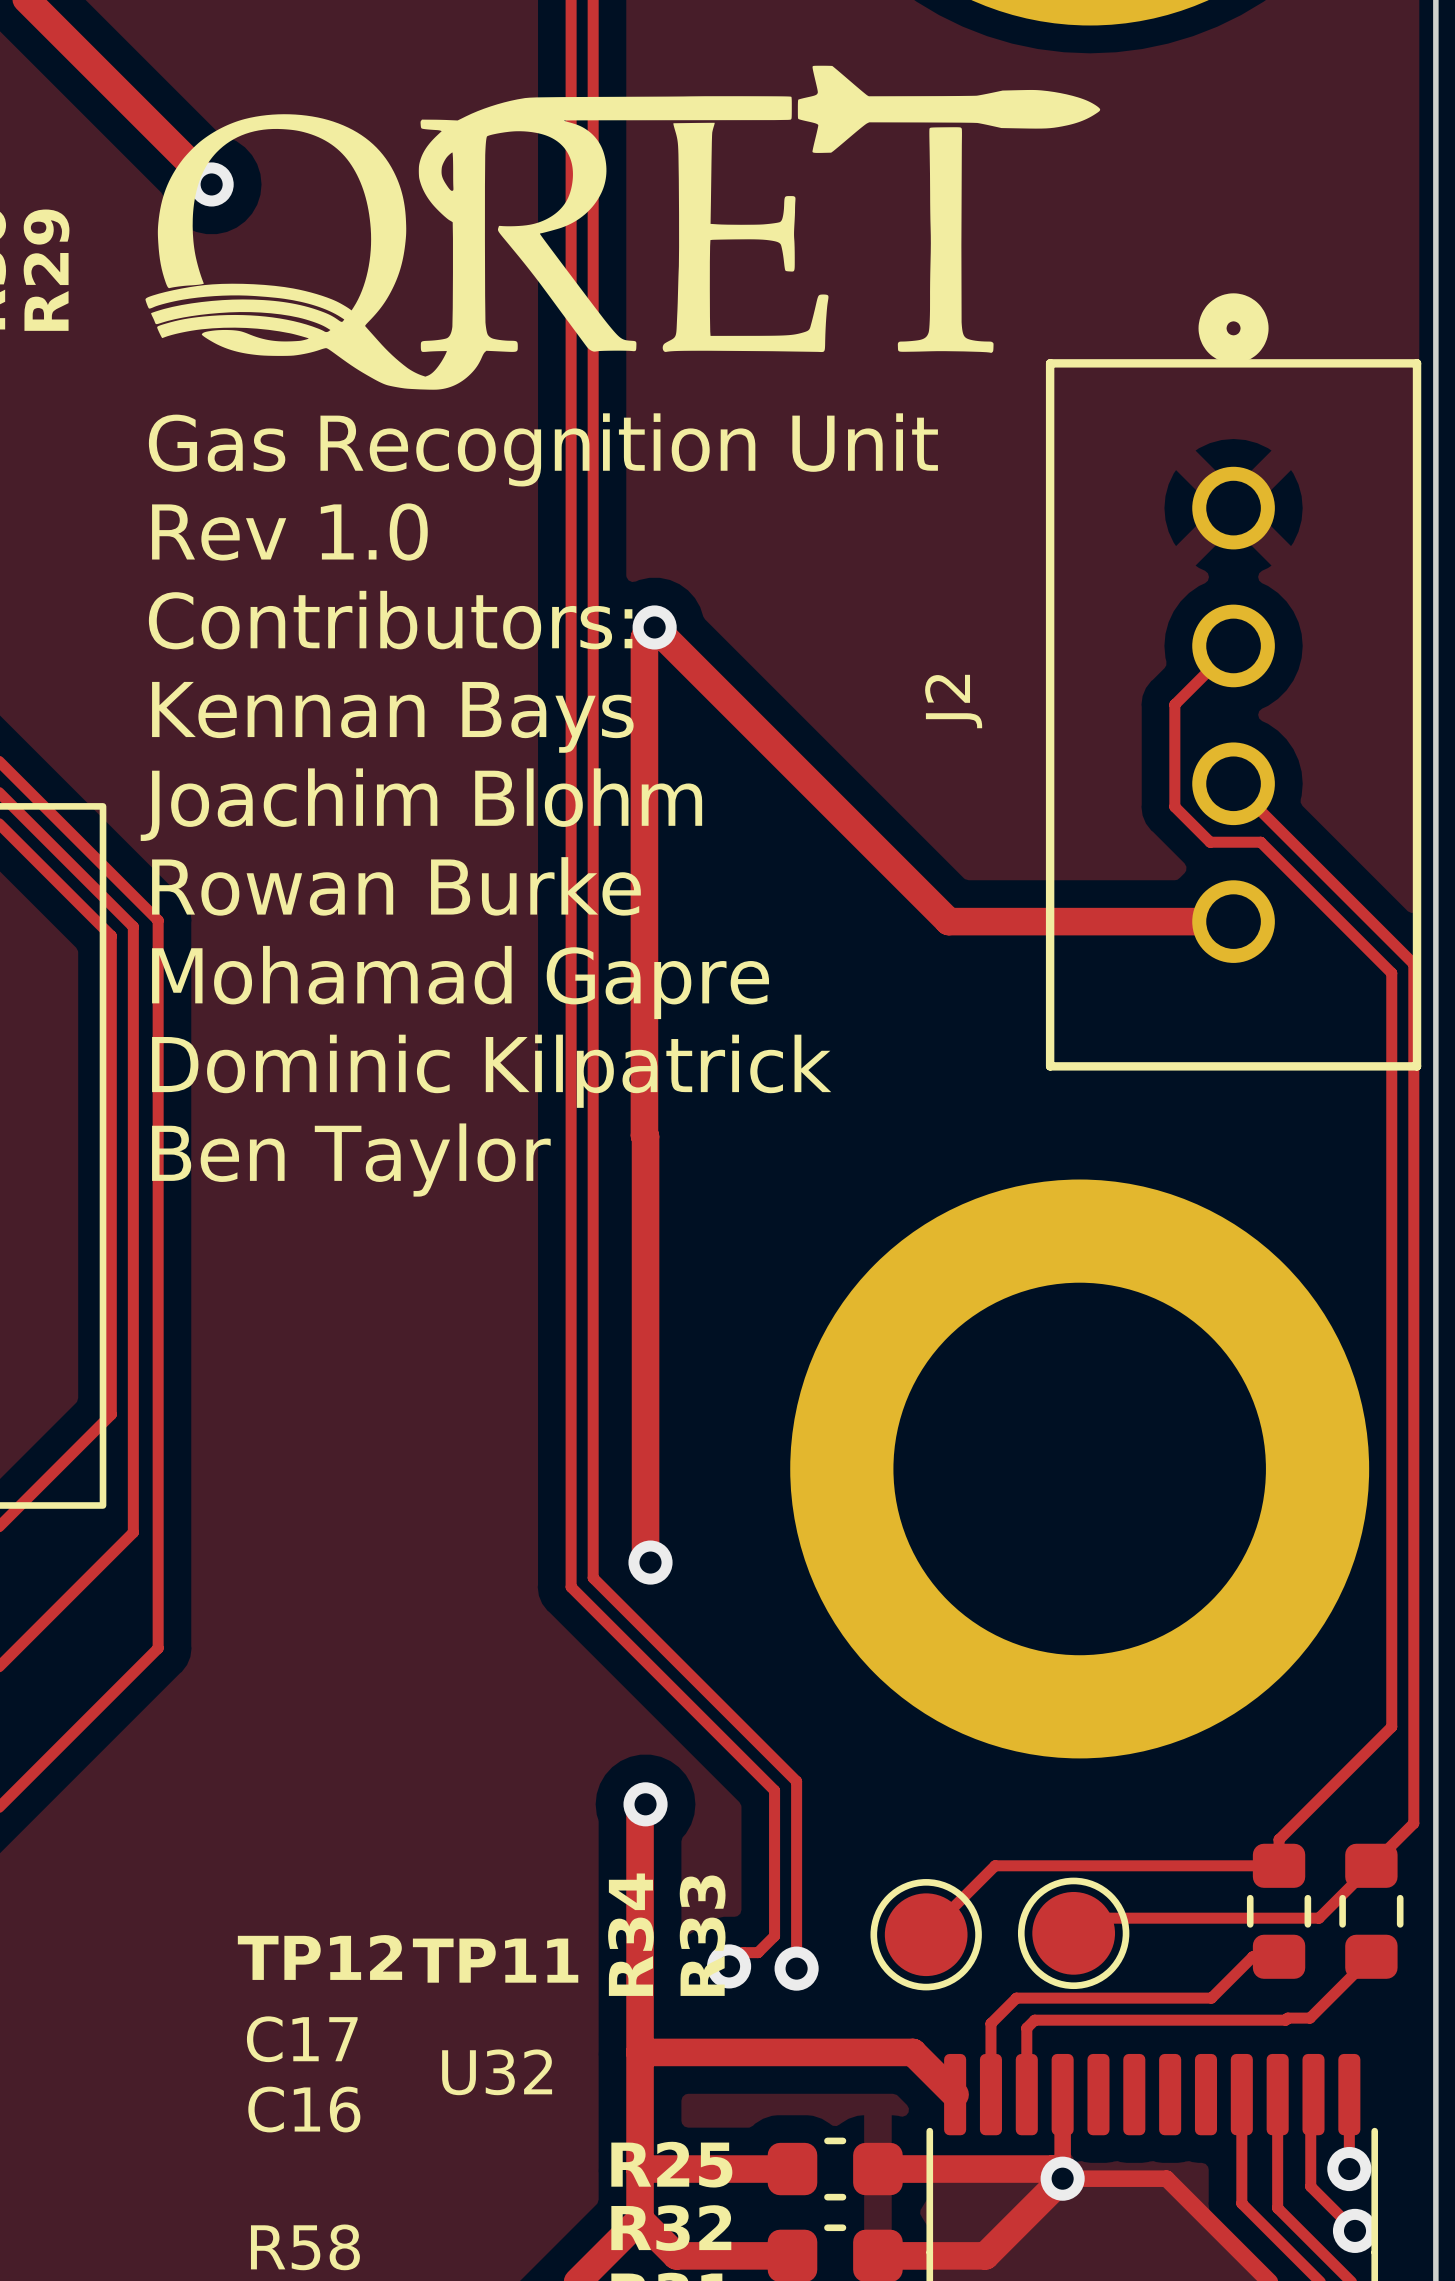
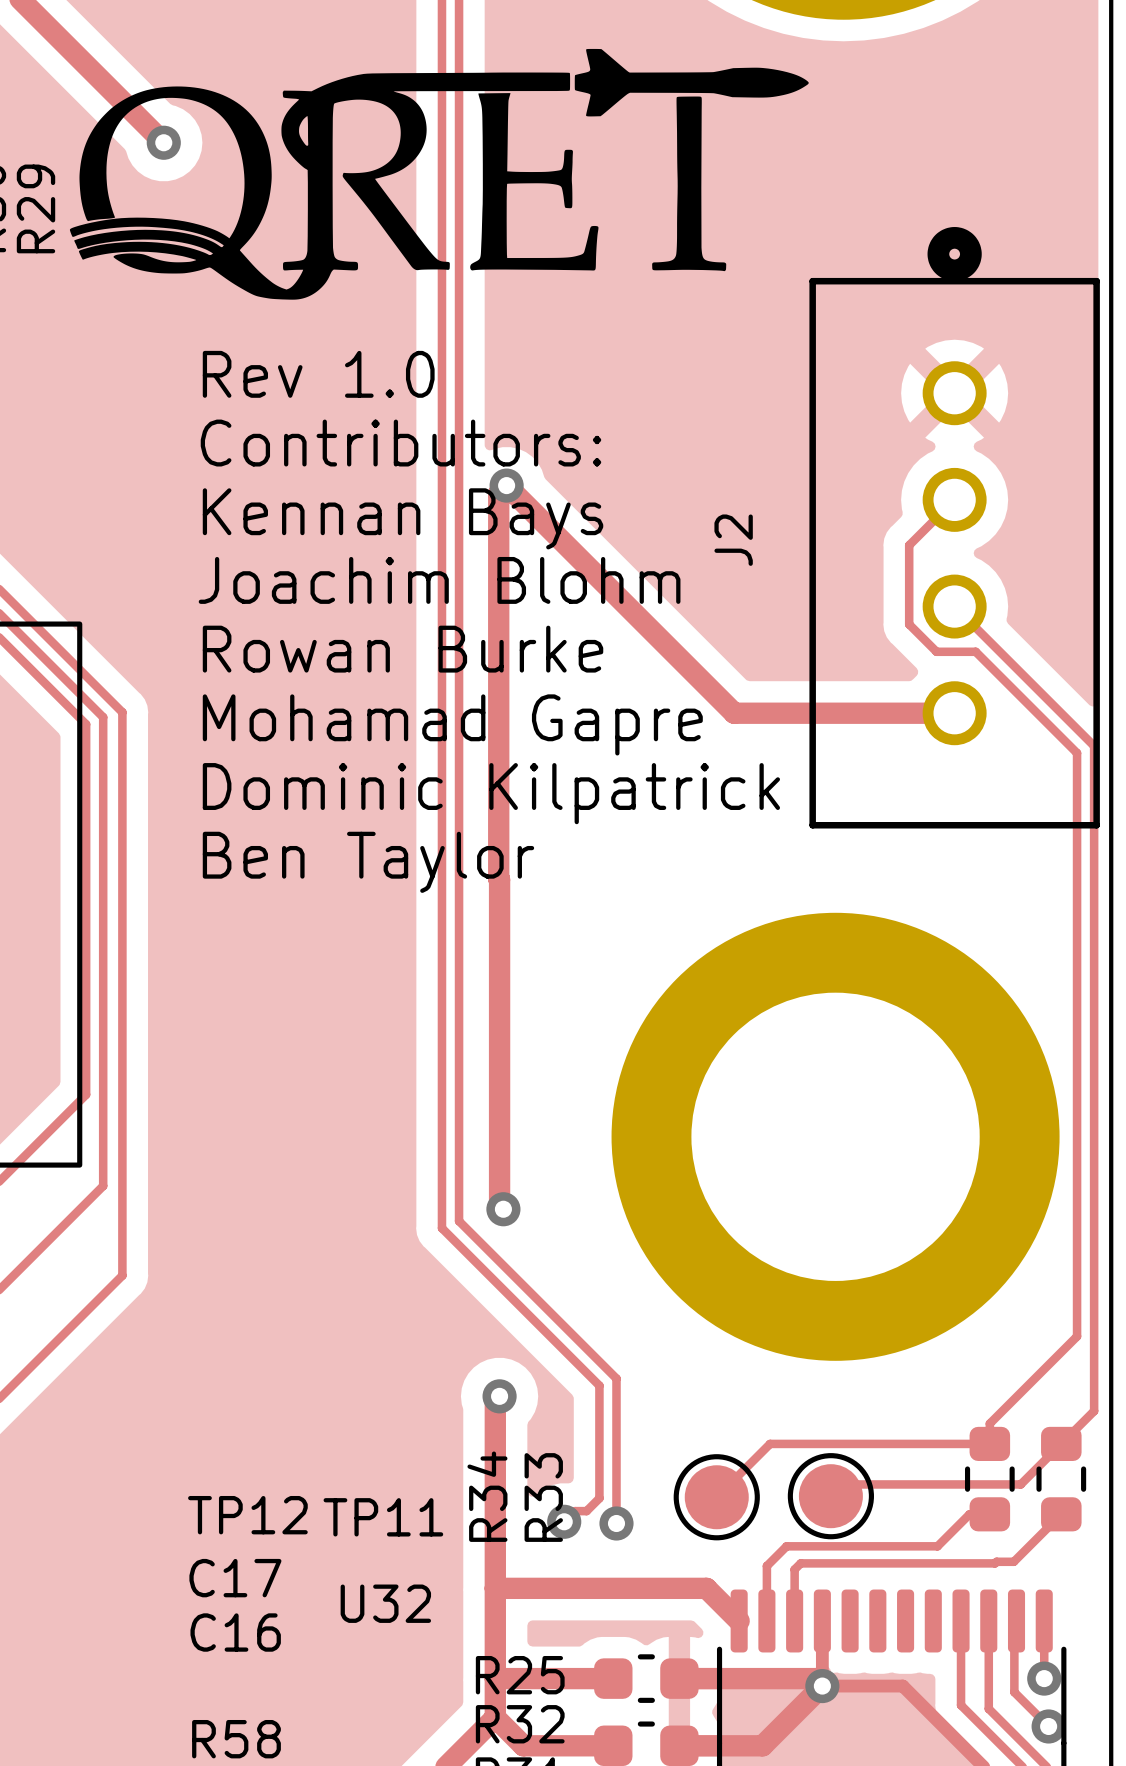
drawing position: (948, 109) -> (691, 82)
drawing position: (745, 237) -> (534, 181)
drawing position: (945, 240) -> (689, 183)
drawing position: (468, 242) -> (320, 186)
text: Gas Recognition Unit (543, 449) -> none
text position: Rev 1.0 (289, 532) -> Rev 1.0 (318, 374)
text position: Contributors: (390, 620) -> Contributors: (400, 443)
text position: Kennan Bays (392, 717) -> Kennan Bays (403, 518)
text position: Joachim Blohm (421, 804) -> Joachim Blohm (439, 580)
text position: Rowan Burke (396, 886) -> Rowan Burke (403, 649)
text position: Mohamad Gapre (460, 982) -> Mohamad Gapre (452, 724)
text position: Dominic Kilpatrick (491, 1071) -> Dominic Kilpatrick (491, 793)
text position: Ben Taylor (351, 1160) -> Ben Taylor (368, 862)

